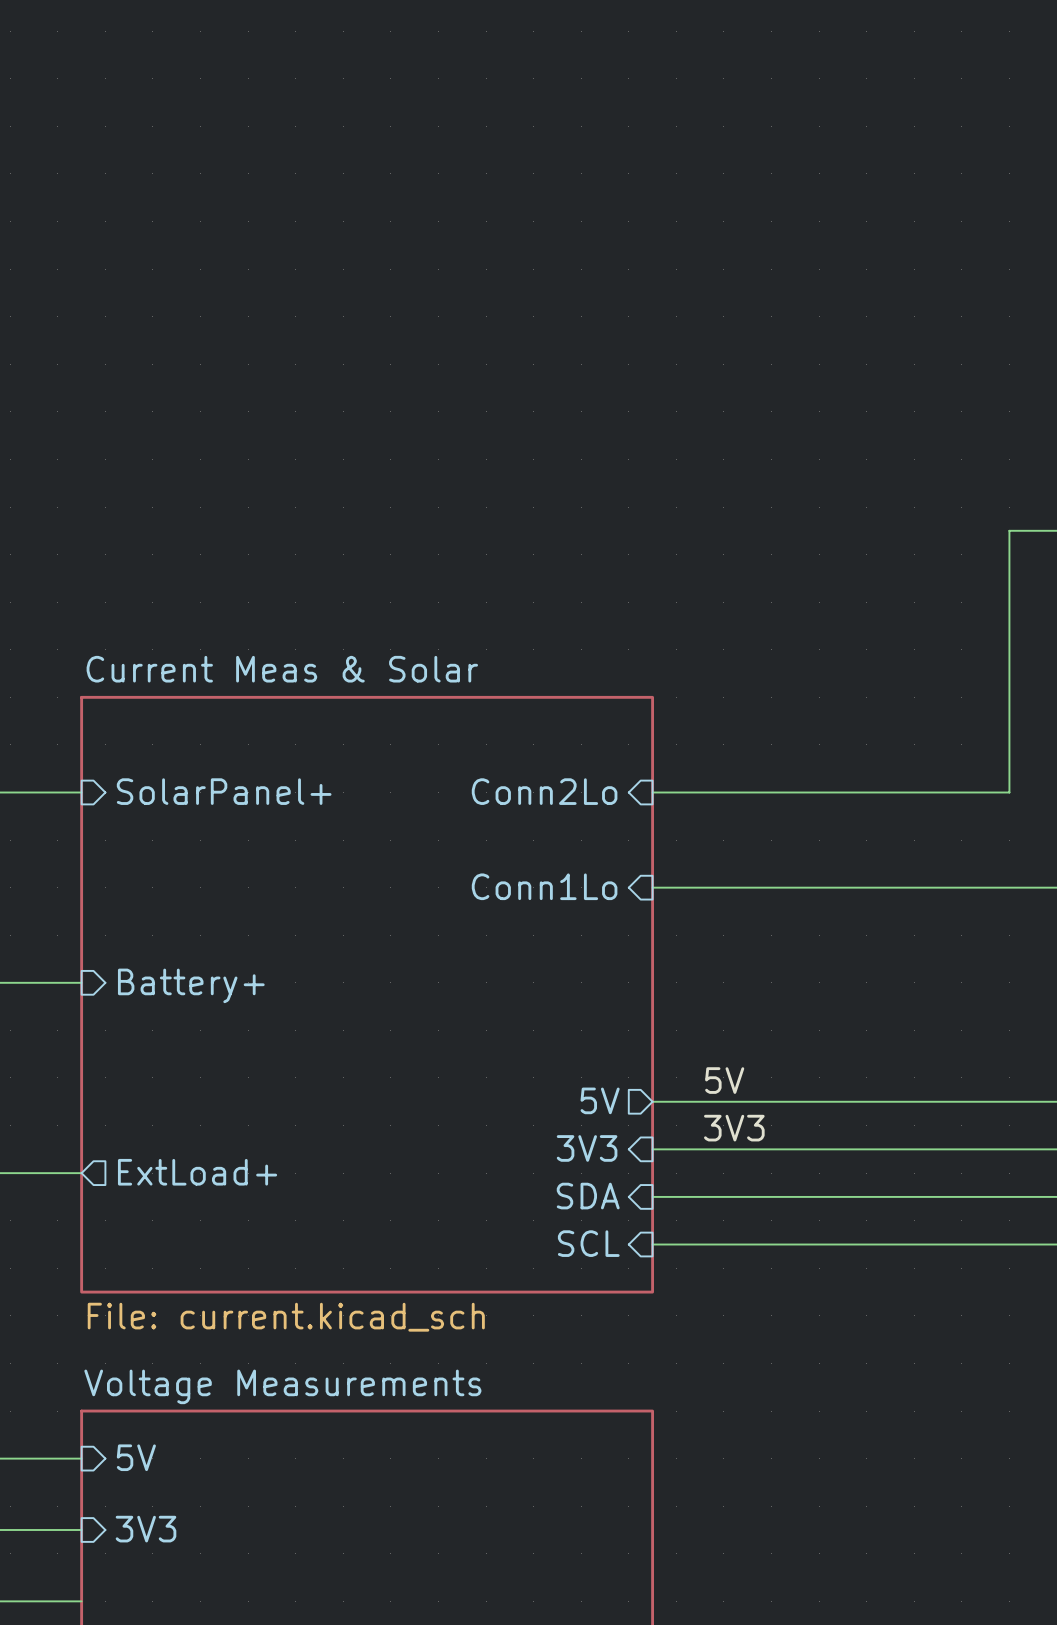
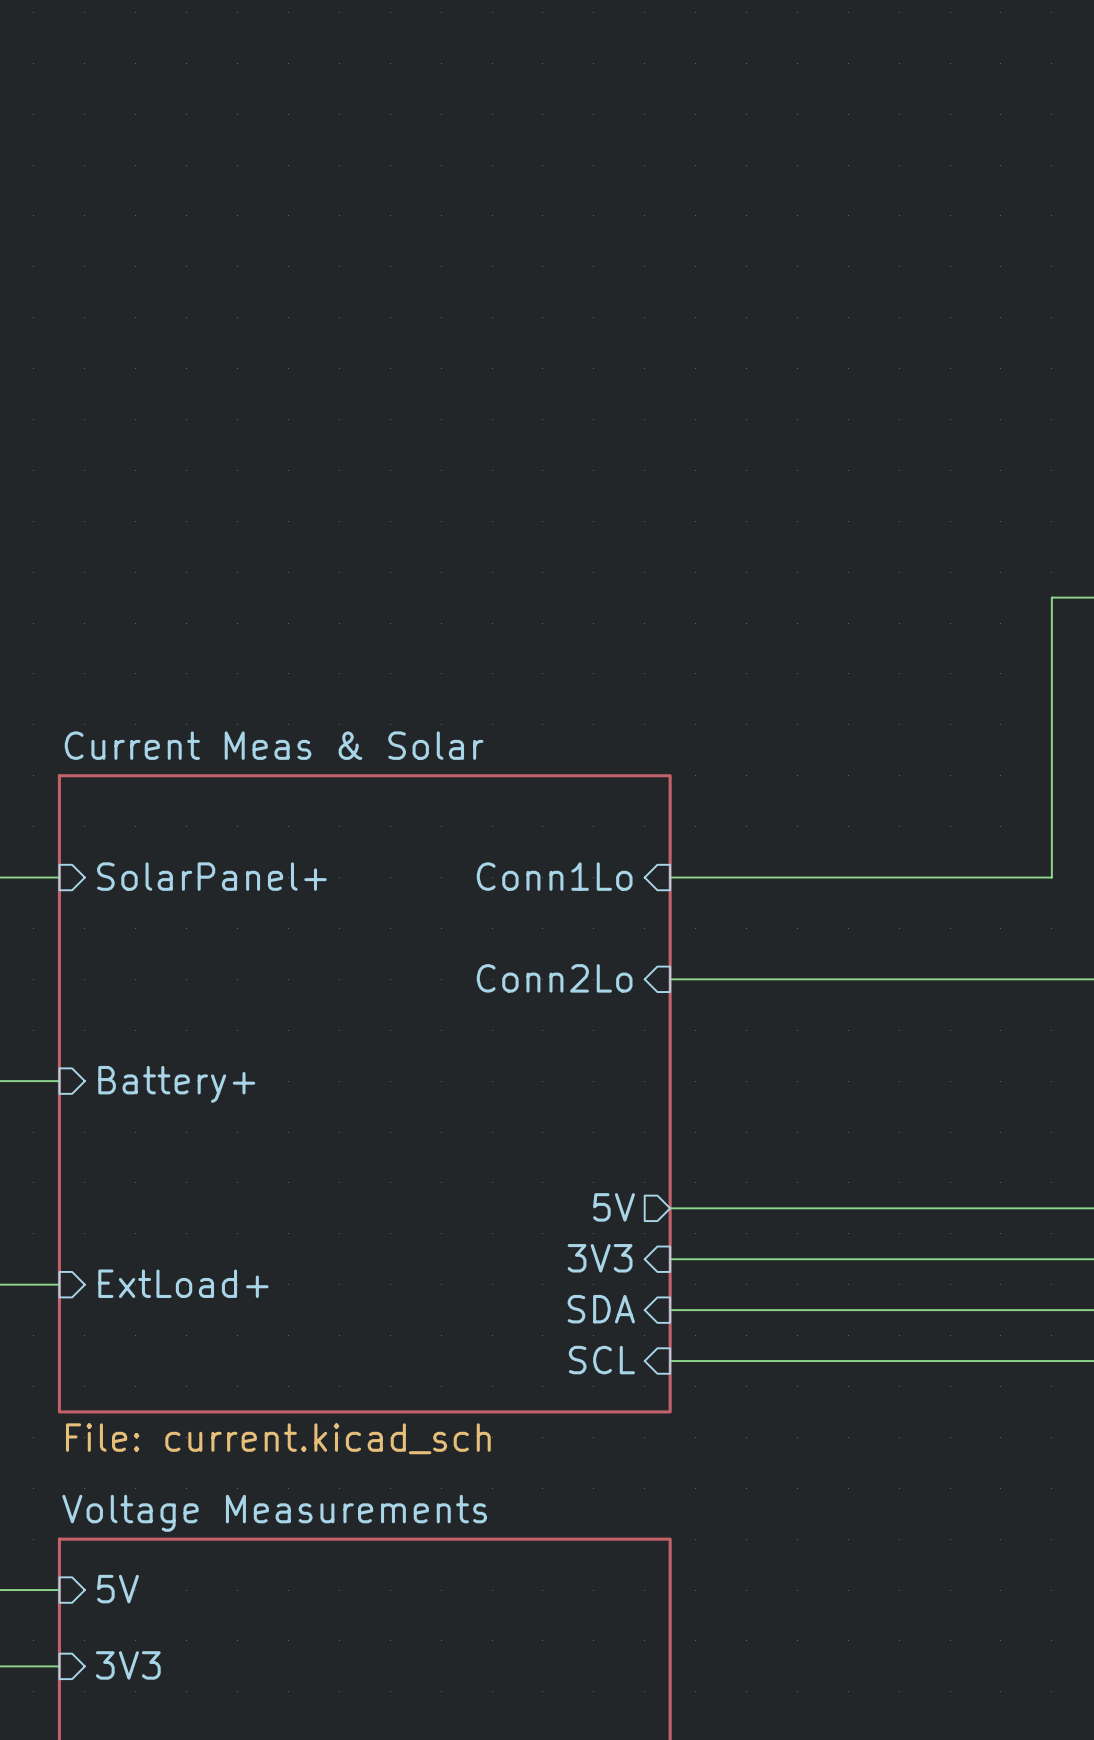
sheet pin: Conn2Lo (544, 791) -> Conn1Lo (554, 876)
sheet pin: Conn1Lo (544, 886) -> Conn2Lo (554, 978)
label: 5V (724, 1080) -> none
label: 3V3 (734, 1128) -> none
sheet pin shape: output (197, 1172) -> input (183, 1283)

